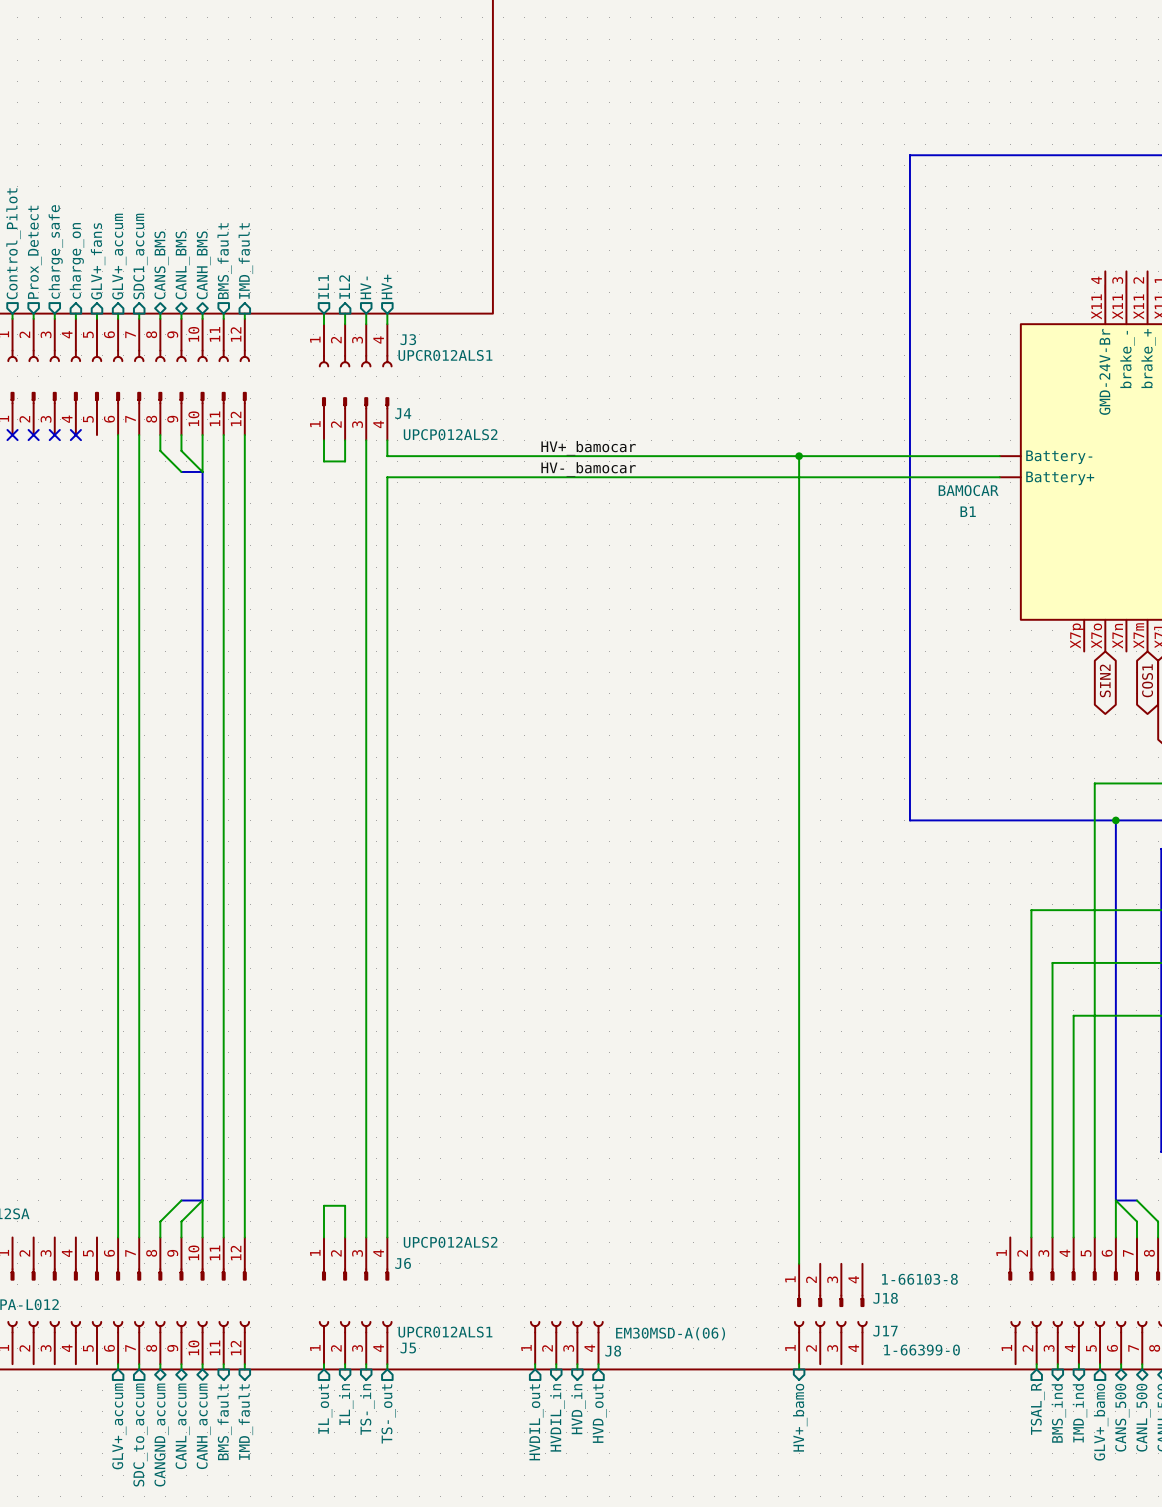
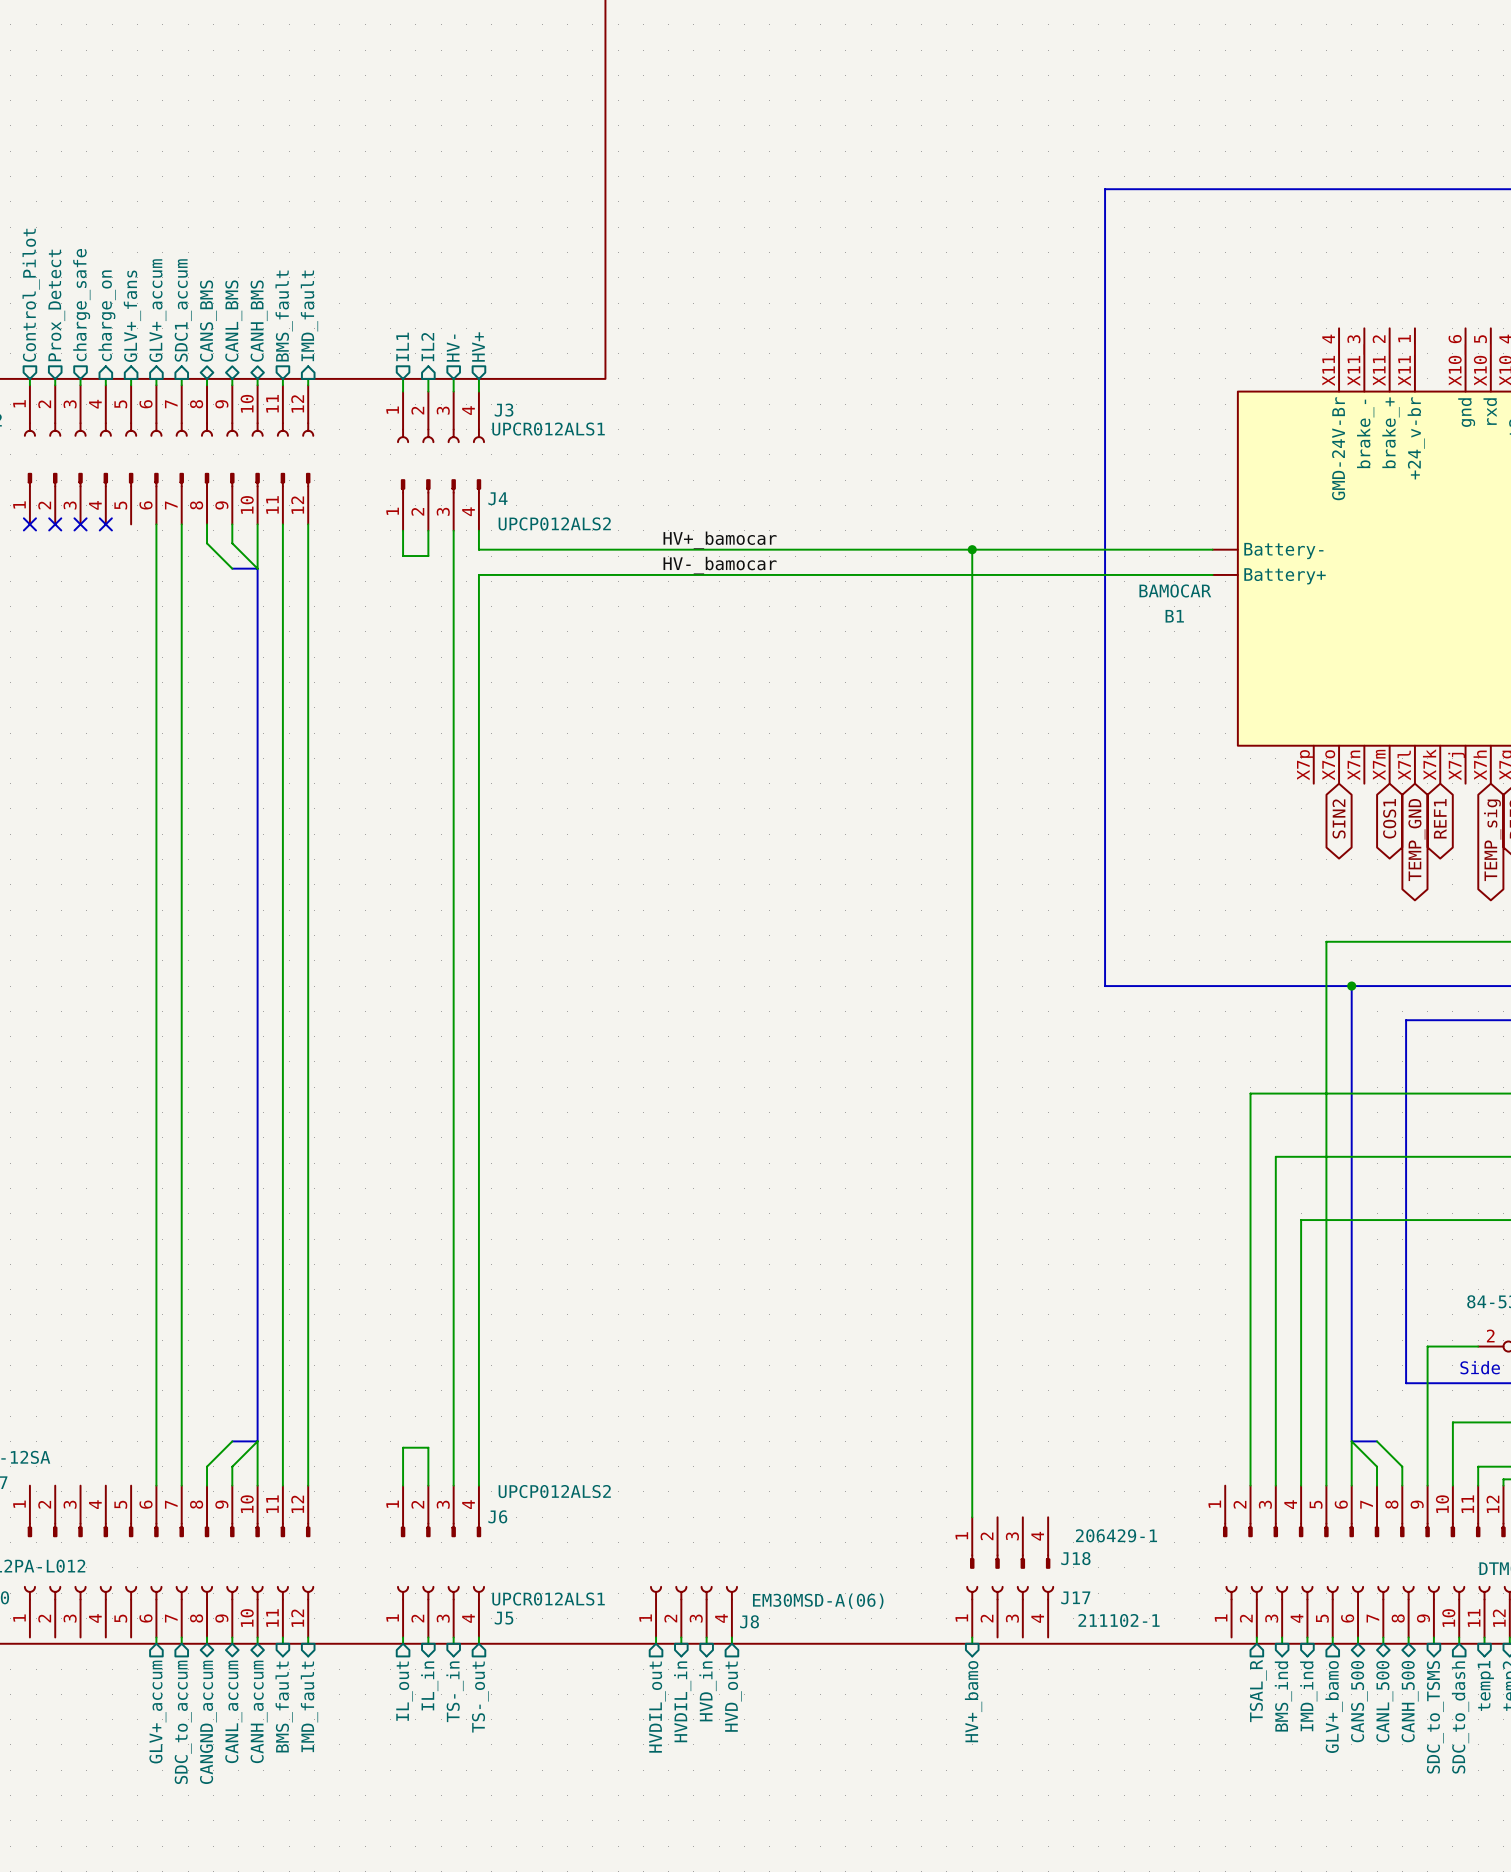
J18 value: 1-66103-8 (919, 1279) -> 206429-1 (1116, 1535)
J17 value: 1-66399-0 (922, 1350) -> 211102-1 (1119, 1620)

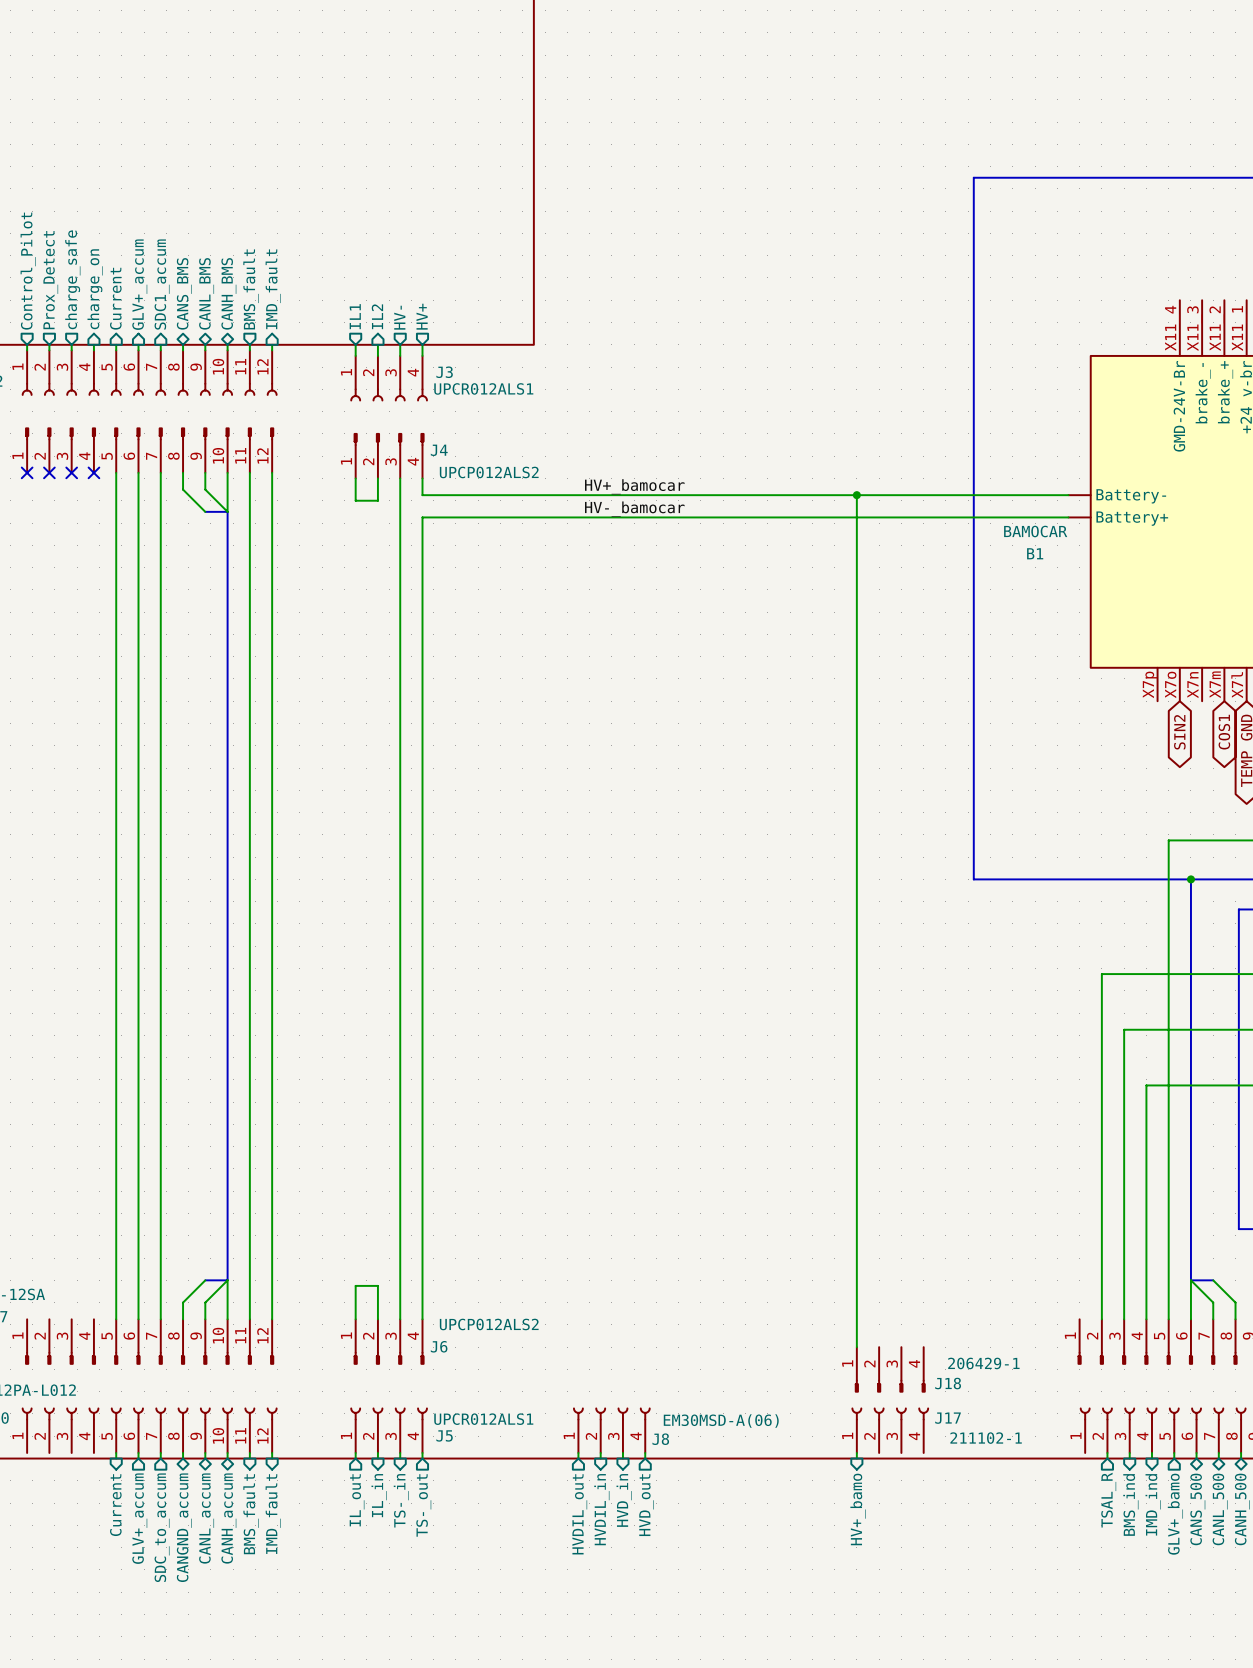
sheet pin: GLV+_fans (132, 316) -> Current (115, 298)
wire: none -> (116, 472) (116, 1319)
wire: none -> (116, 1452) (116, 1458)
sheet pin: none -> Current (115, 1505)

